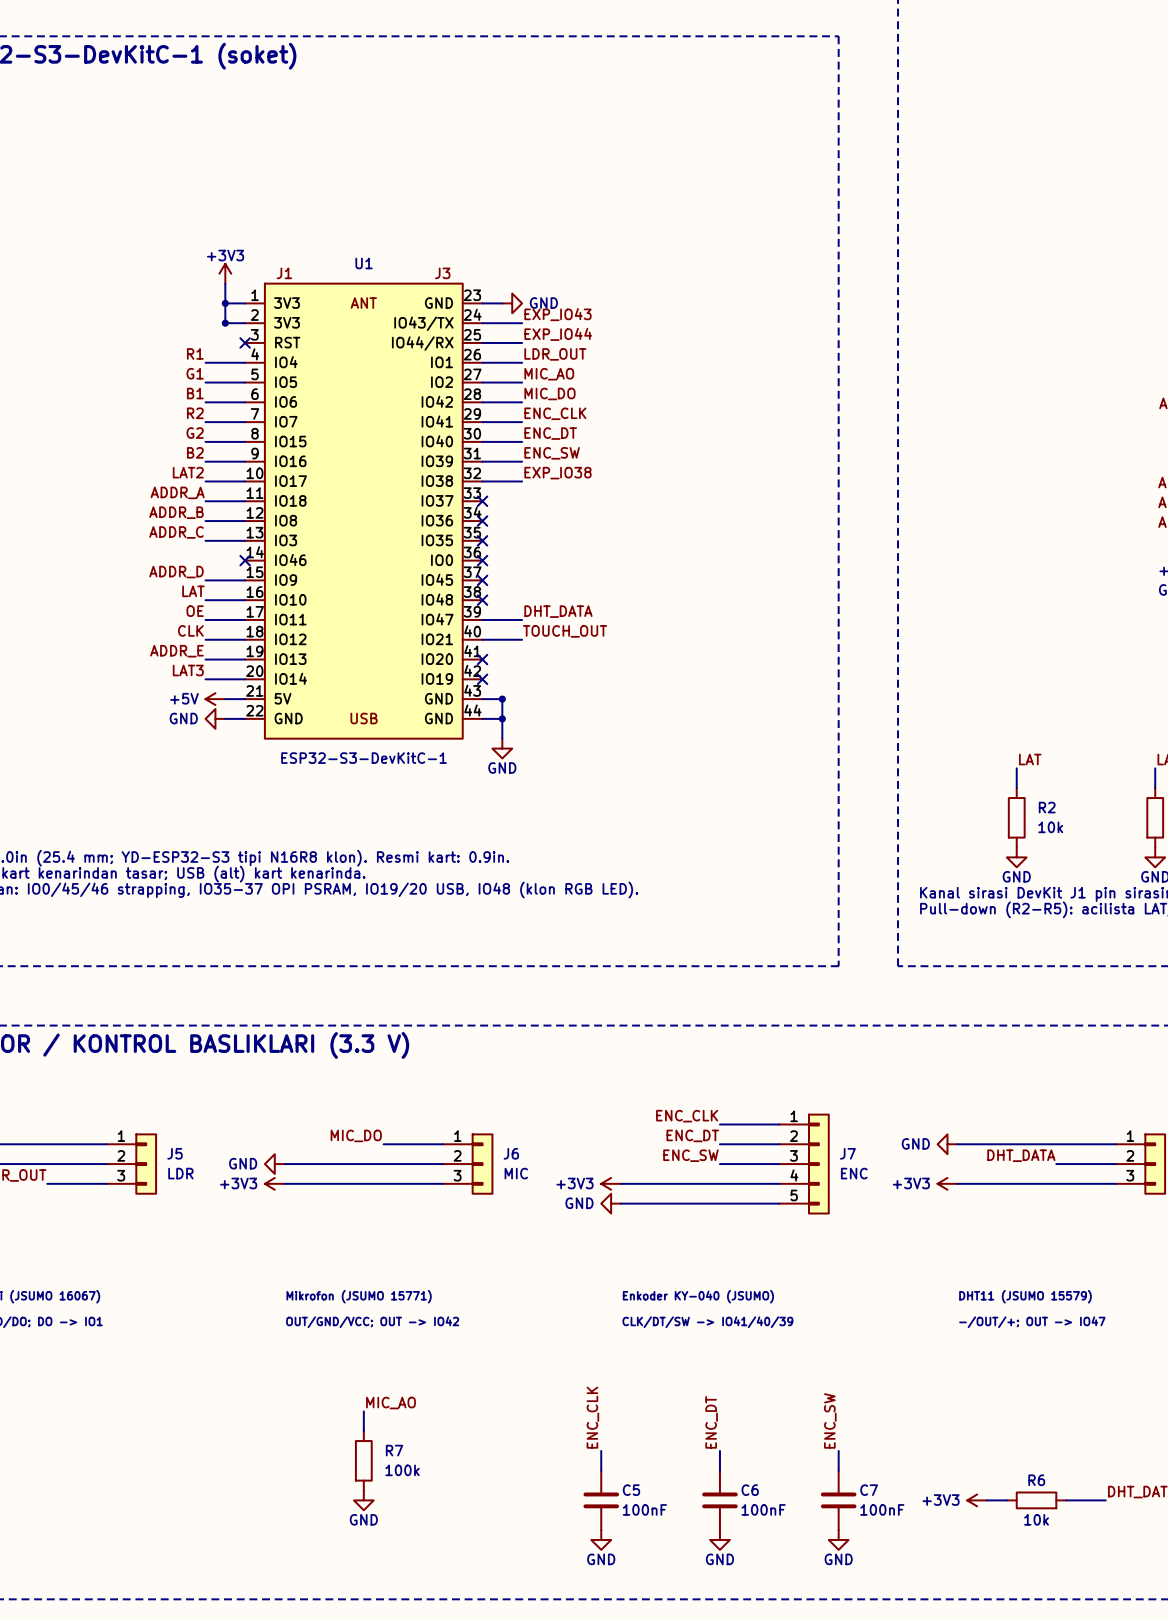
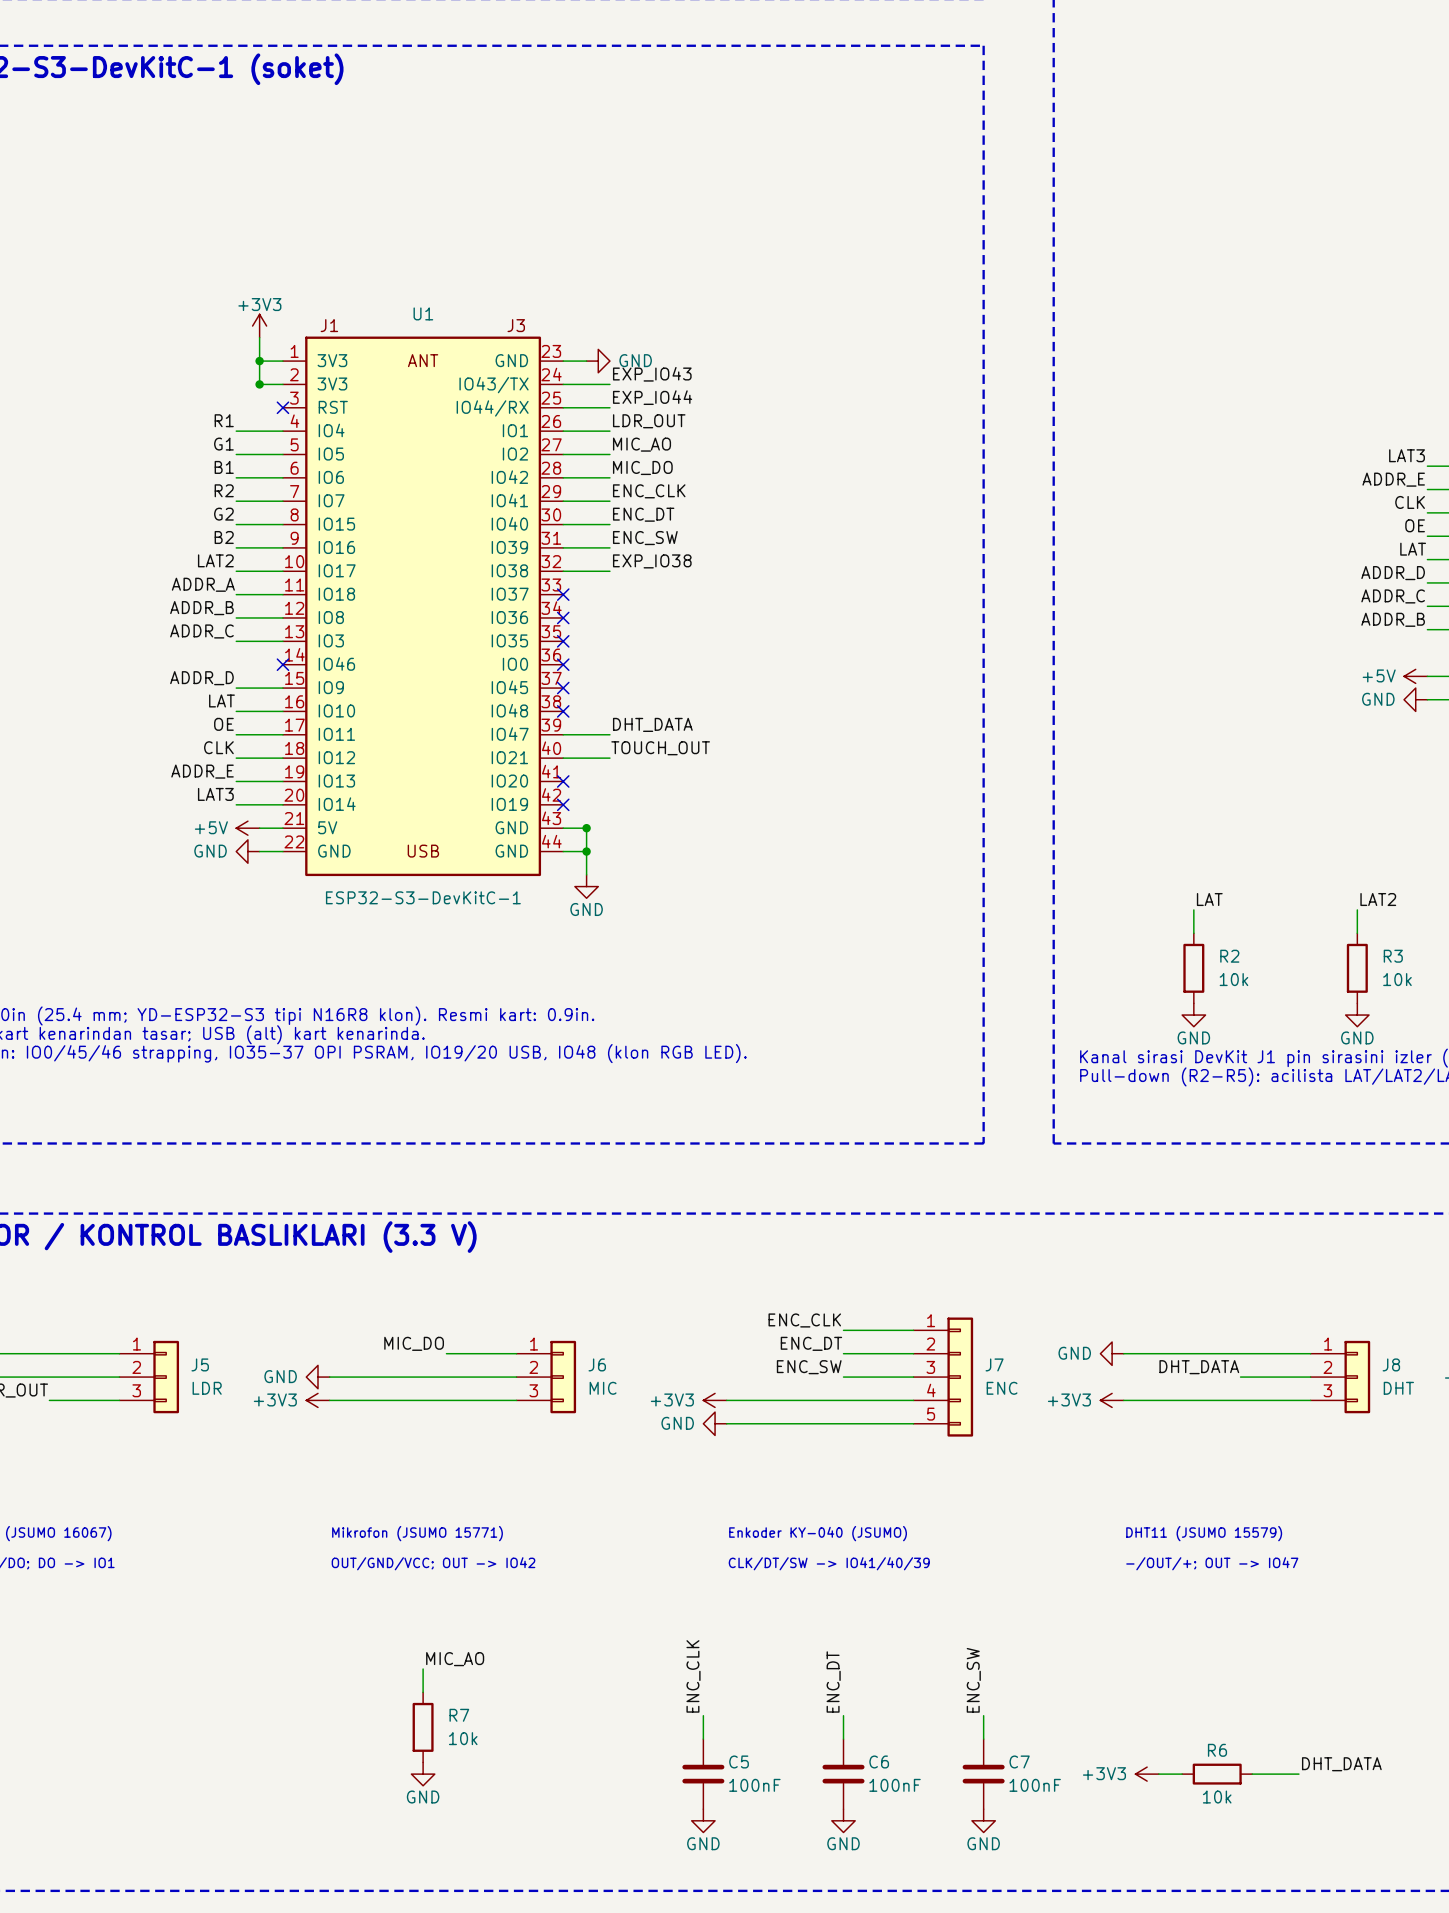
R7 value: 100k (402, 1470) -> 10k (463, 1738)

